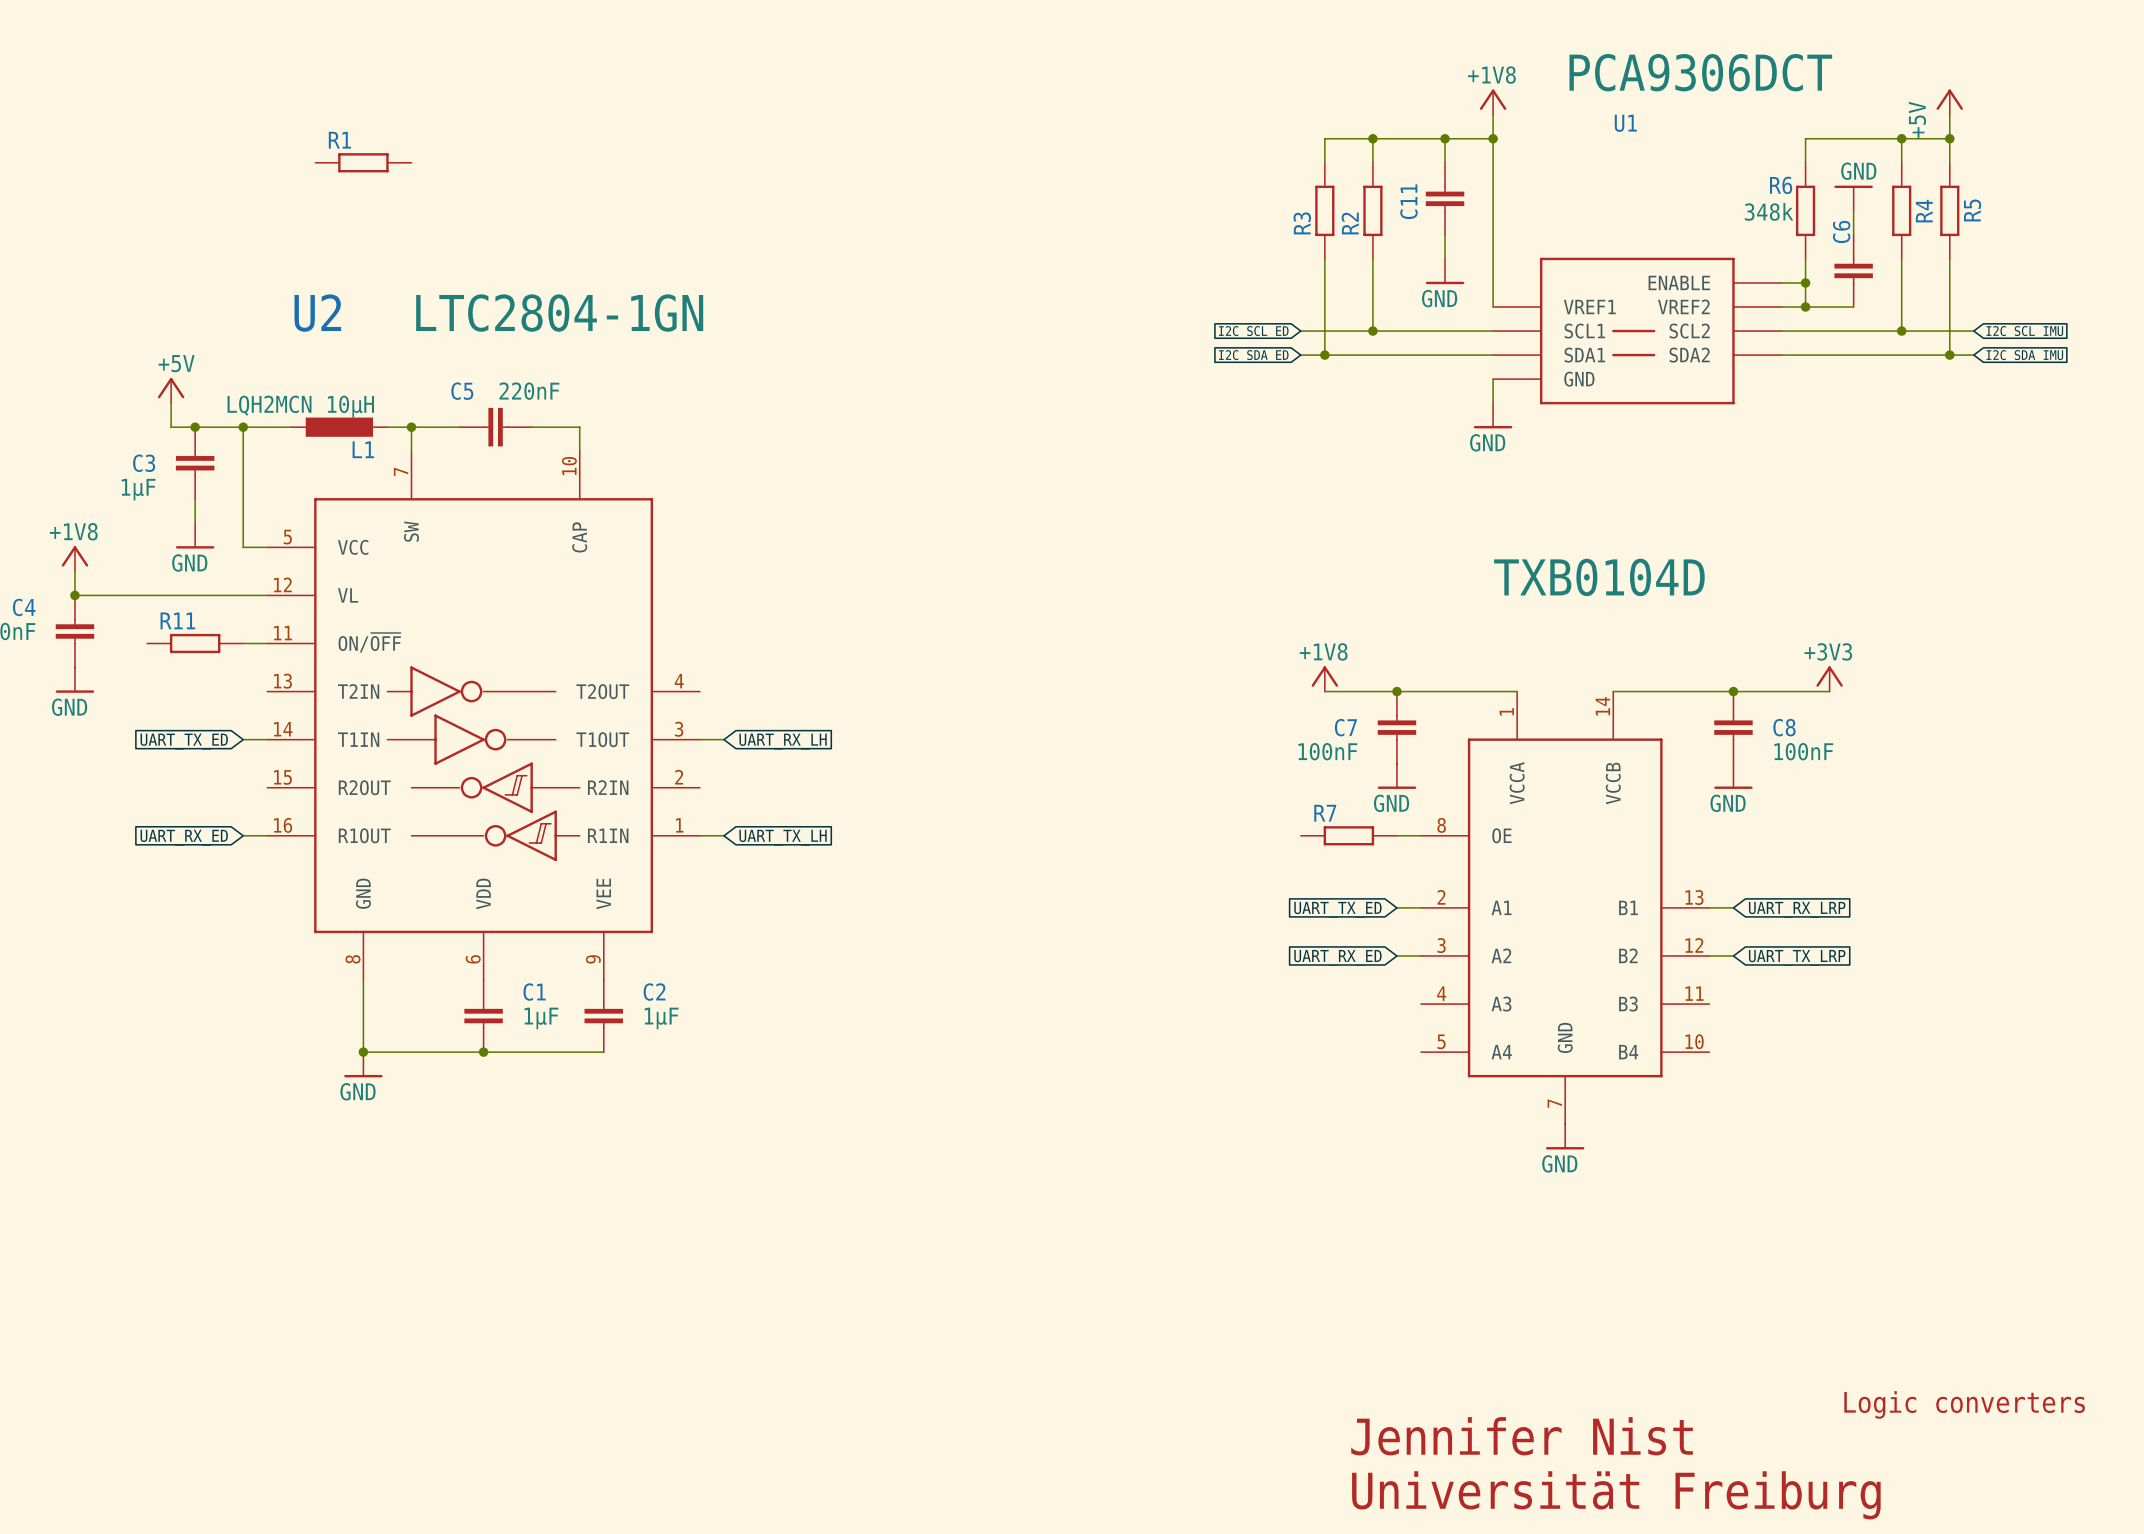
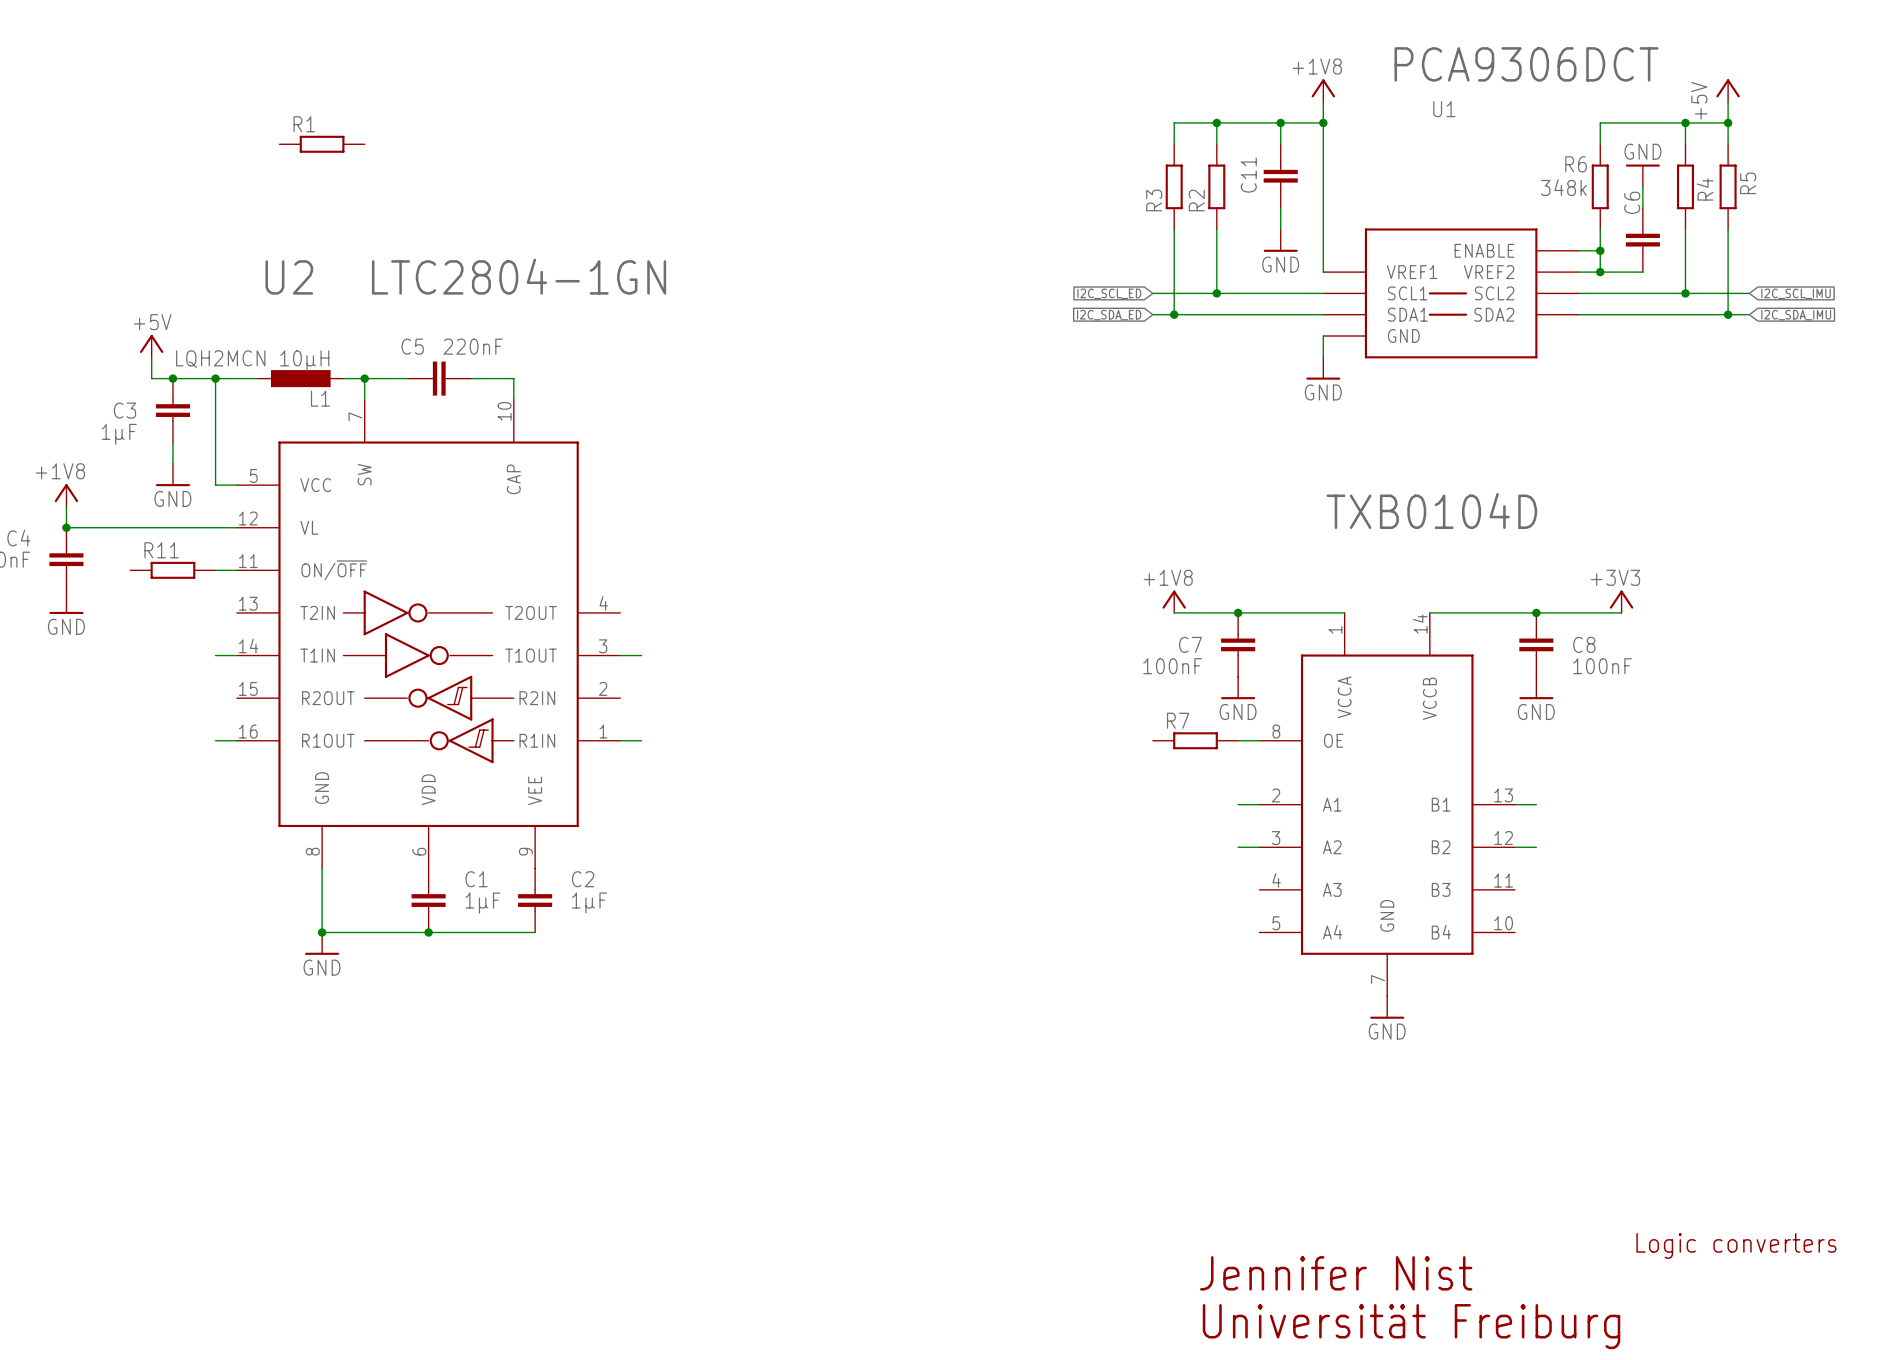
global label: UART_TX_ED (184, 741) -> none
global label: UART_RX_LH (783, 741) -> none
global label: UART_RX_ED (184, 837) -> none
global label: UART_TX_LH (783, 837) -> none
global label: UART_TX_ED (1337, 909) -> none
global label: UART_RX_LRP (1797, 909) -> none
global label: UART_RX_ED (1337, 957) -> none
global label: UART_TX_LRP (1797, 957) -> none

